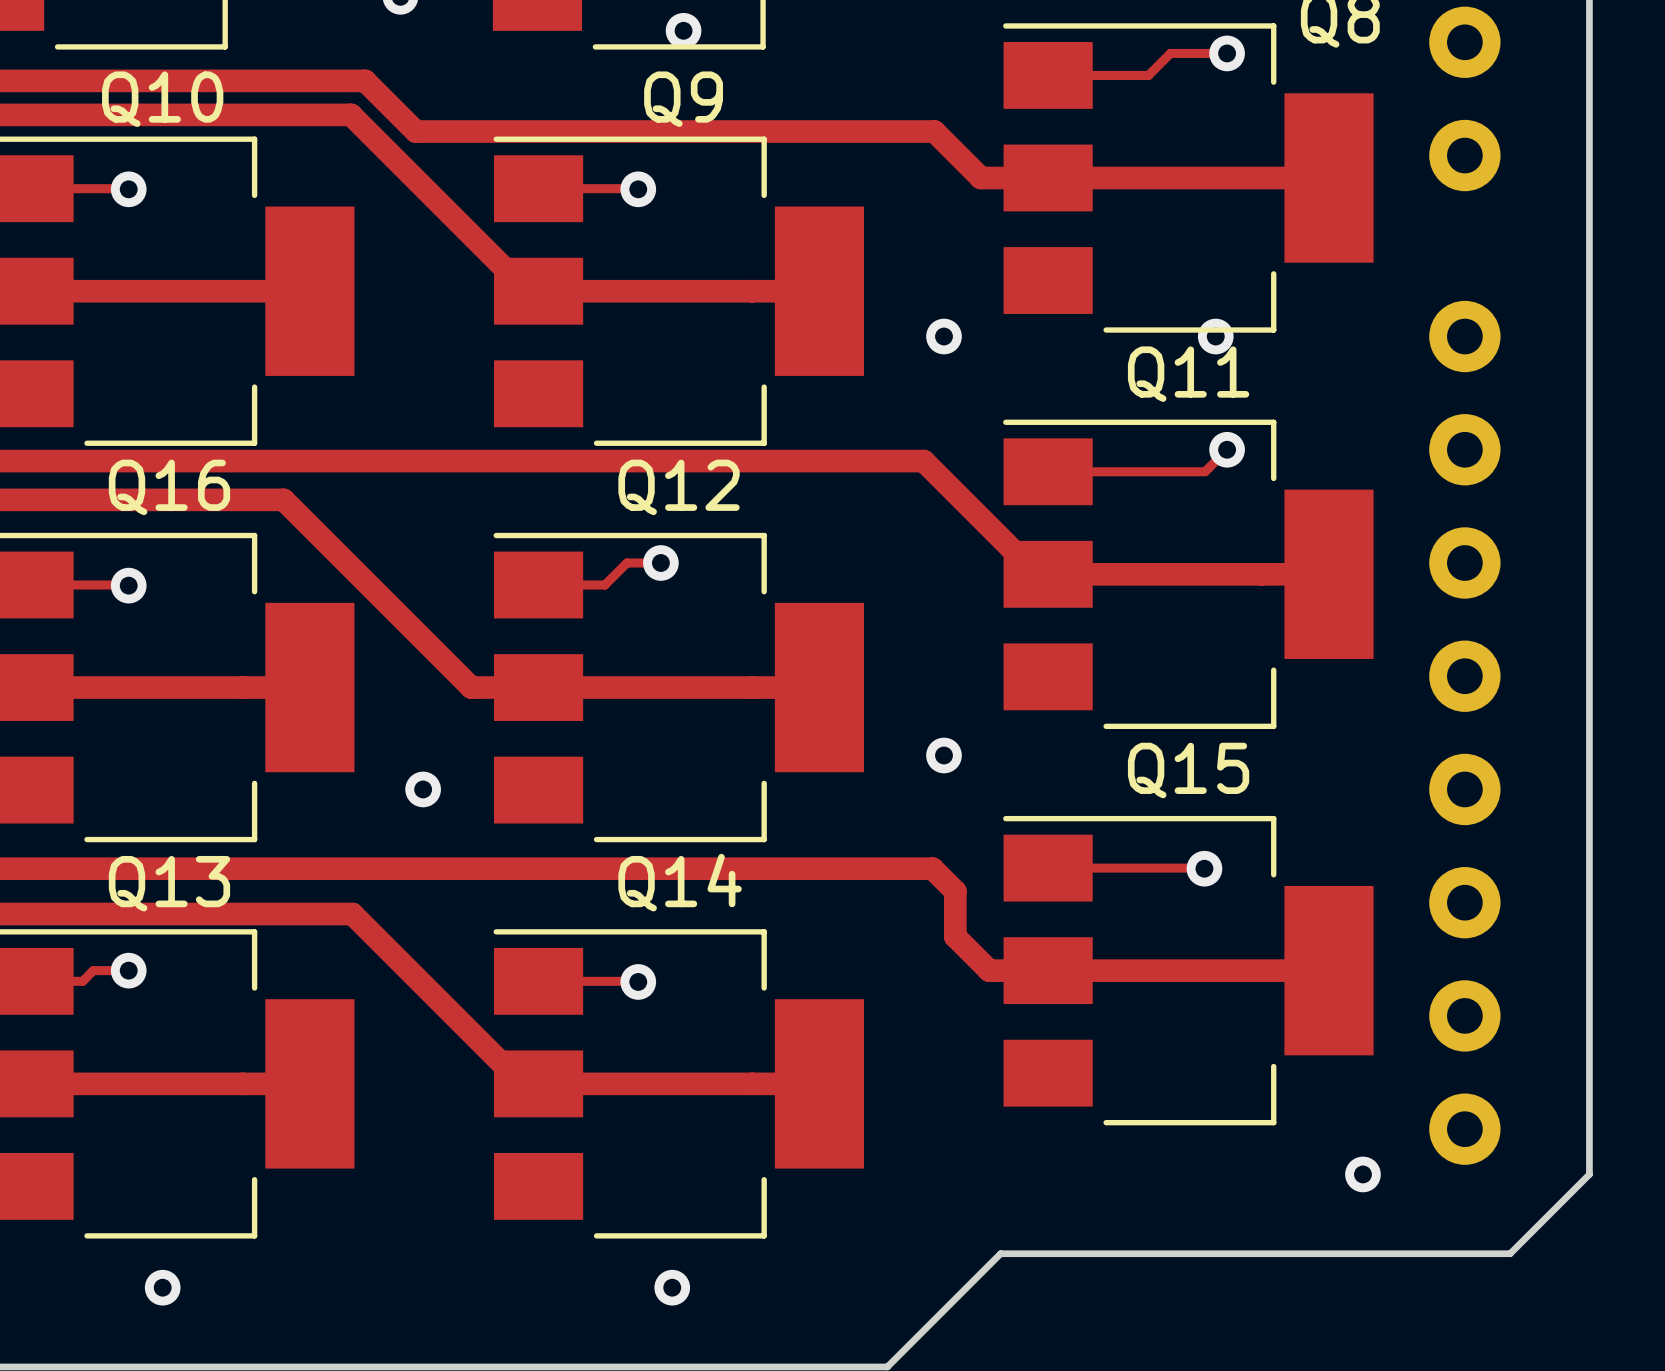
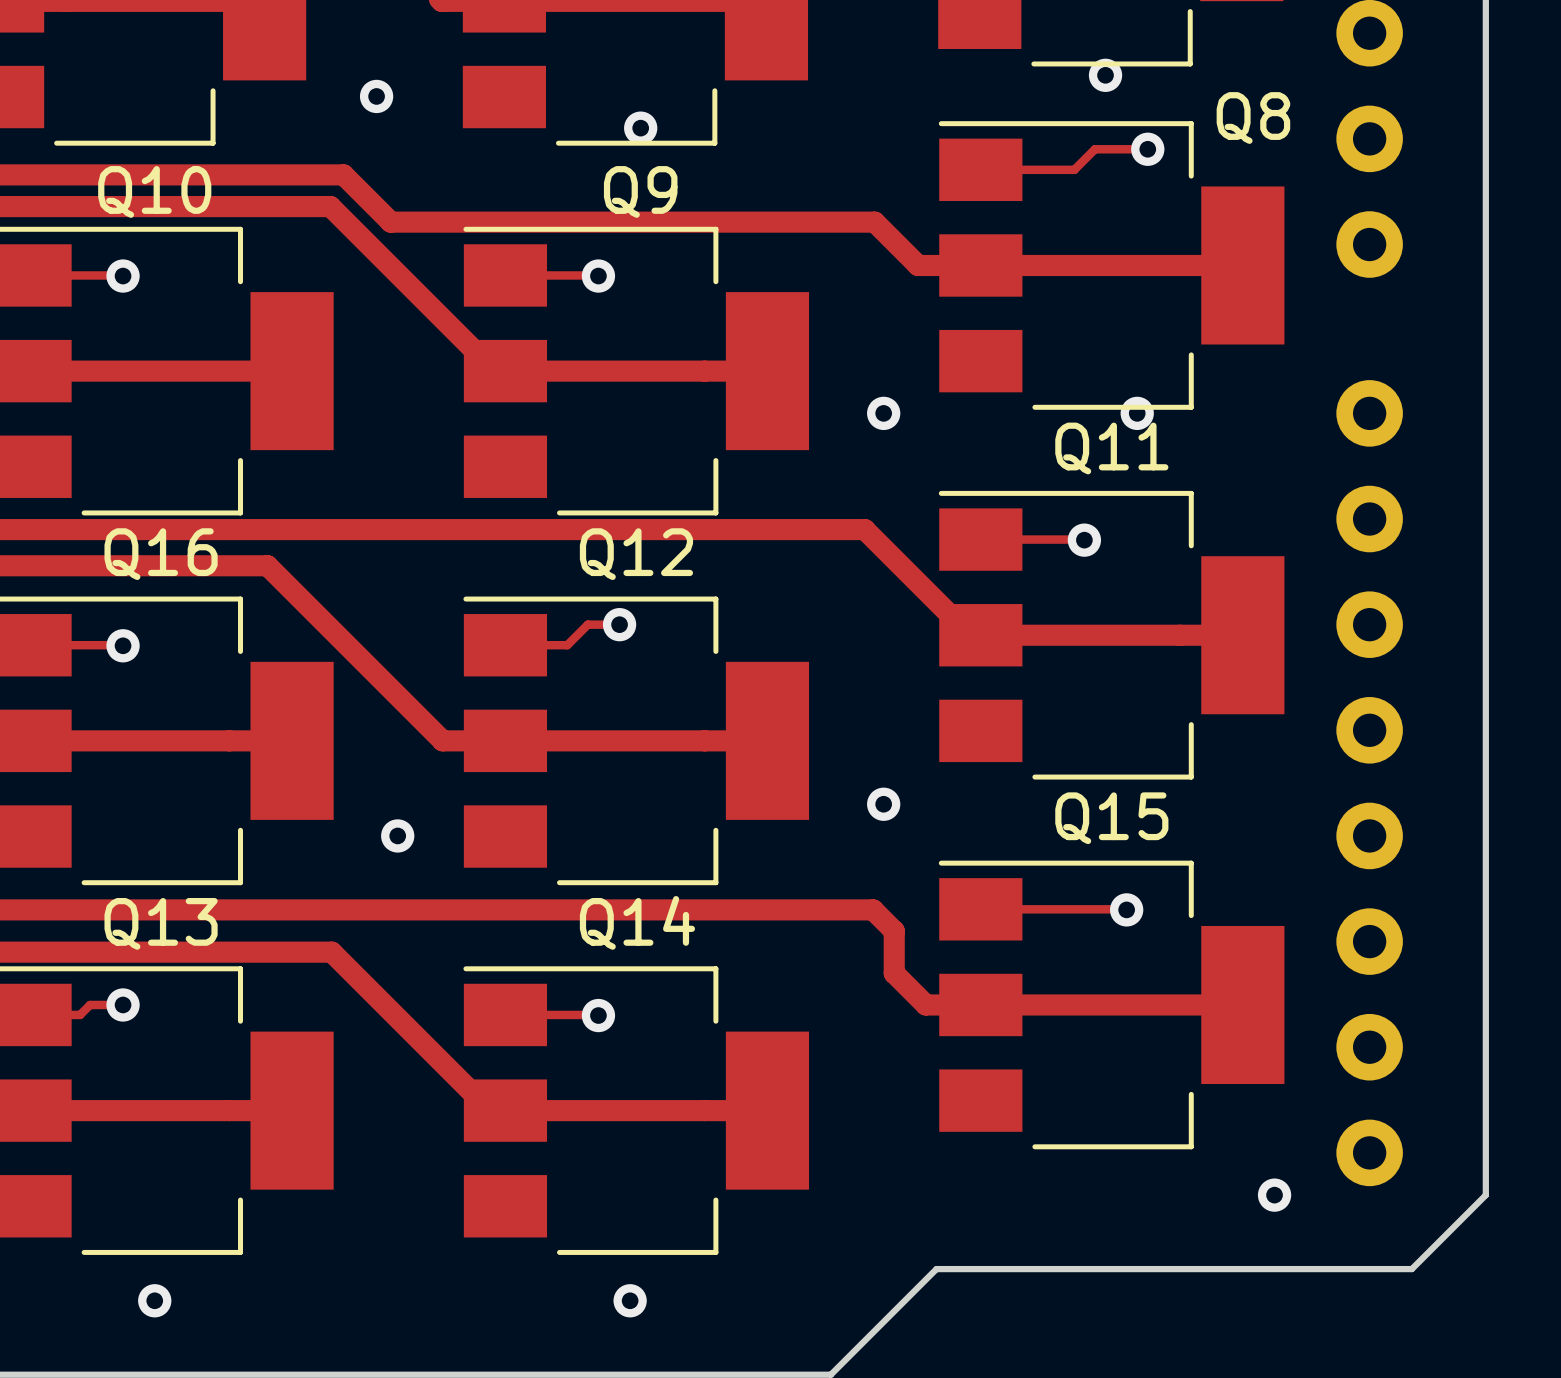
track: (1227, 449) (1205, 471) (1158, 471) -> none
via position: (1227, 449) -> (1084, 540)

